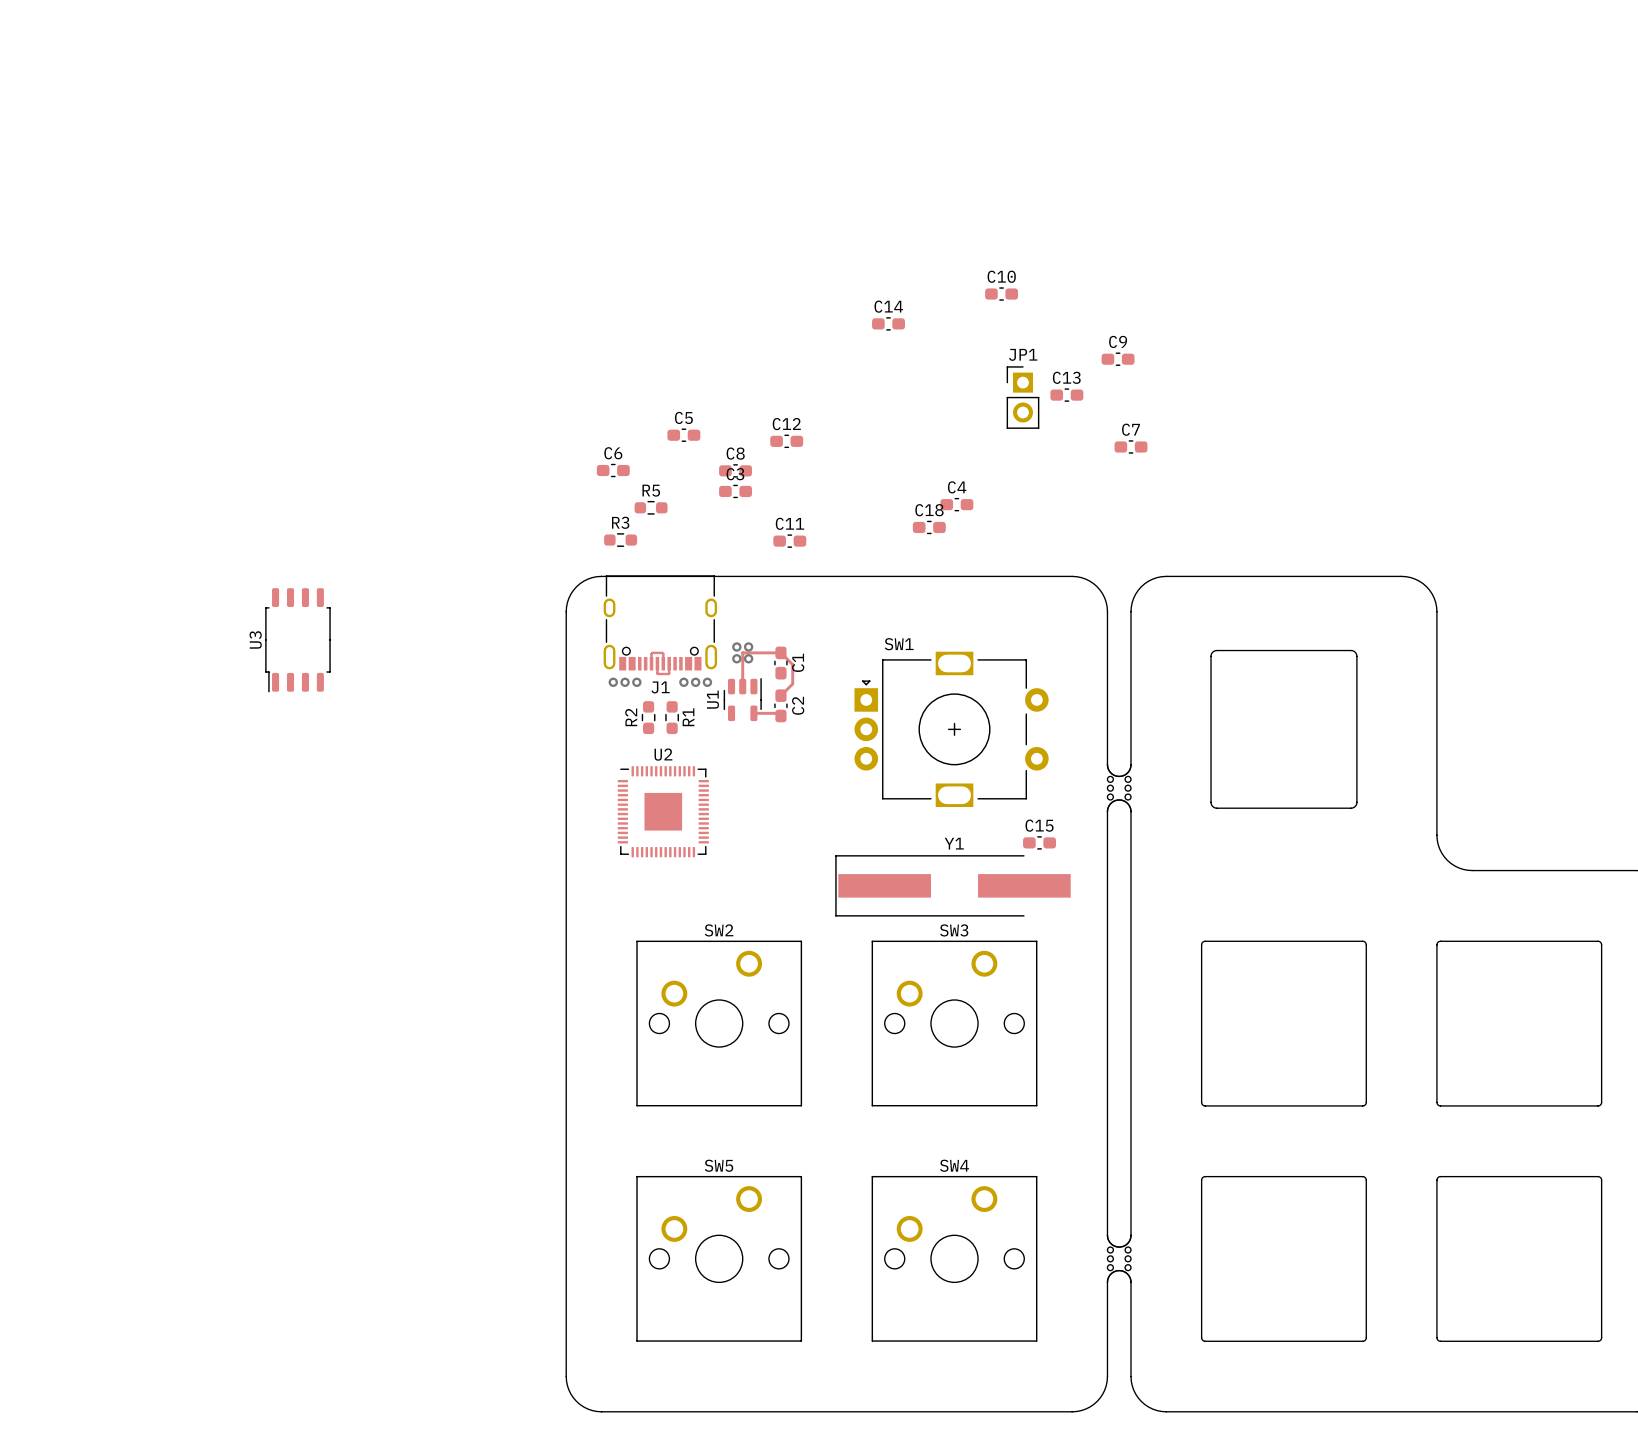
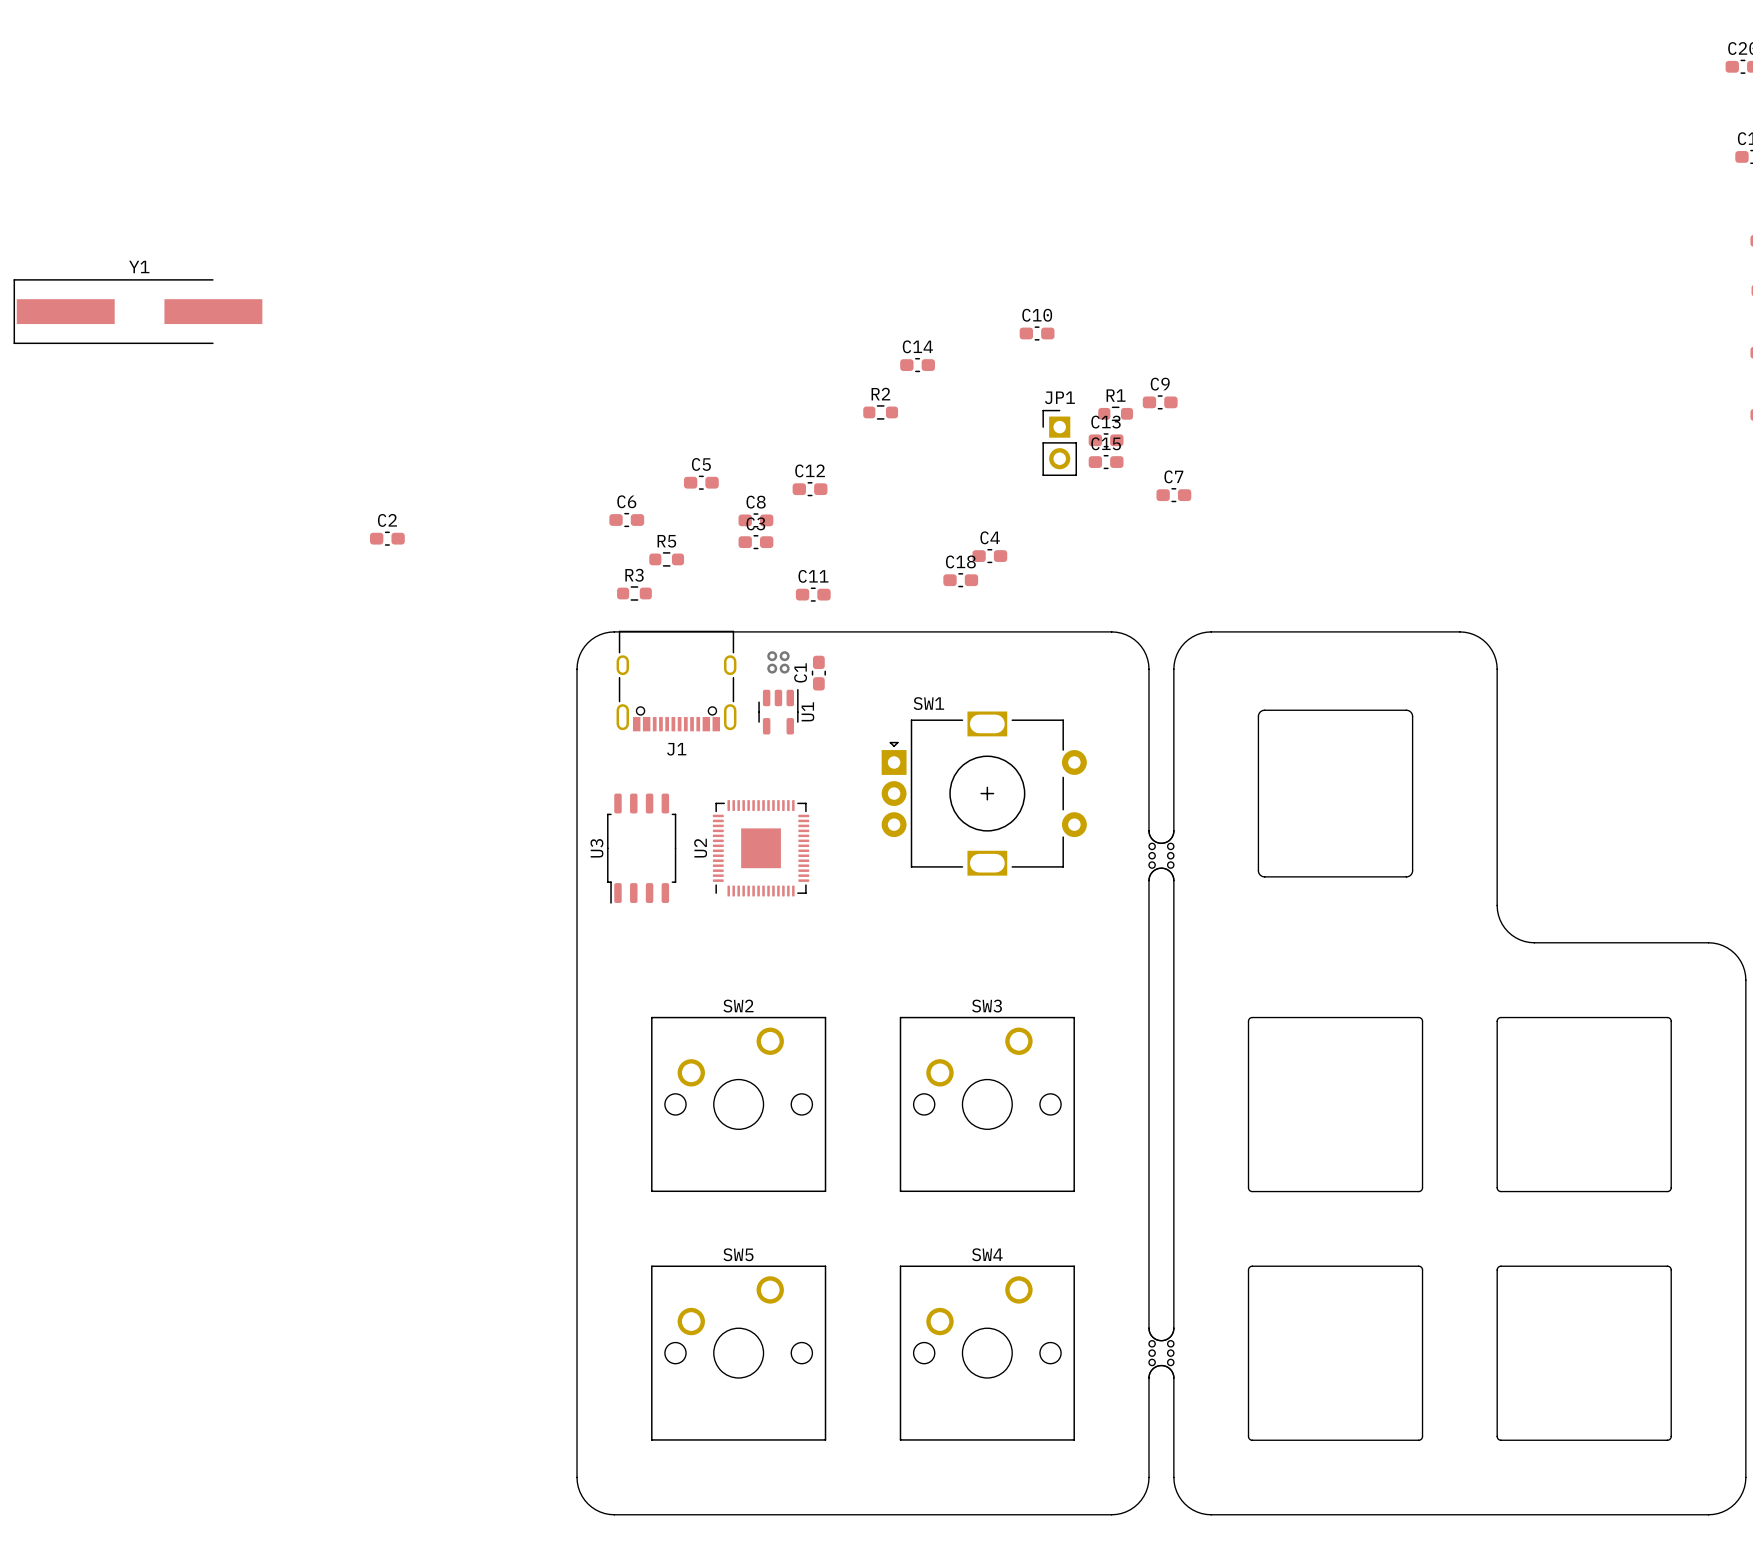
via: none -> (772, 656)
via: none -> (784, 656)
via: none -> (772, 668)
via: none -> (784, 668)
U3 position: (297, 640) -> (641, 848)
via: (736, 647) -> none
via: (748, 647) -> none
via: (736, 658) -> none
via: (748, 658) -> none
C1 name position: C1 (798, 662) -> C1 (800, 672)
track: (651, 663) (652, 652) (663, 654) (663, 663) -> none
track: (657, 663) (657, 674) (668, 674) (669, 663) -> none
C1 position: (780, 663) -> (818, 673)
via: (613, 682) -> none
via: (625, 682) -> none
via: (636, 682) -> none
via: (683, 682) -> none
via: (695, 682) -> none
via: (707, 682) -> none
track: (742, 686) (742, 652) (780, 652) (792, 664) (792, 683) (780, 695) -> none
U1 name position: U1 (712, 699) -> U1 (807, 711)
U1 position: (742, 699) -> (778, 711)
C2 rotation: 0° (780, 705) -> 90° clockwise (387, 538)
C2 position: (780, 705) -> (387, 538)
C2 name position: C2 (798, 705) -> C2 (387, 520)
track: (753, 713) (778, 713) (780, 715) -> none
R2 rotation: 0° (648, 717) -> 90° clockwise (880, 412)
R2 position: (648, 717) -> (880, 412)
R1 rotation: 0° (672, 717) -> 90° clockwise (1115, 413)
R1 position: (672, 717) -> (1115, 413)
R1 name position: R1 (688, 717) -> R1 (1116, 395)
U2 rotation: 0° (663, 811) -> 90° counterclockwise (761, 848)
U2 position: (663, 811) -> (761, 848)
C15 position: (1039, 842) -> (1106, 462)
Y1 position: (952, 885) -> (137, 311)

